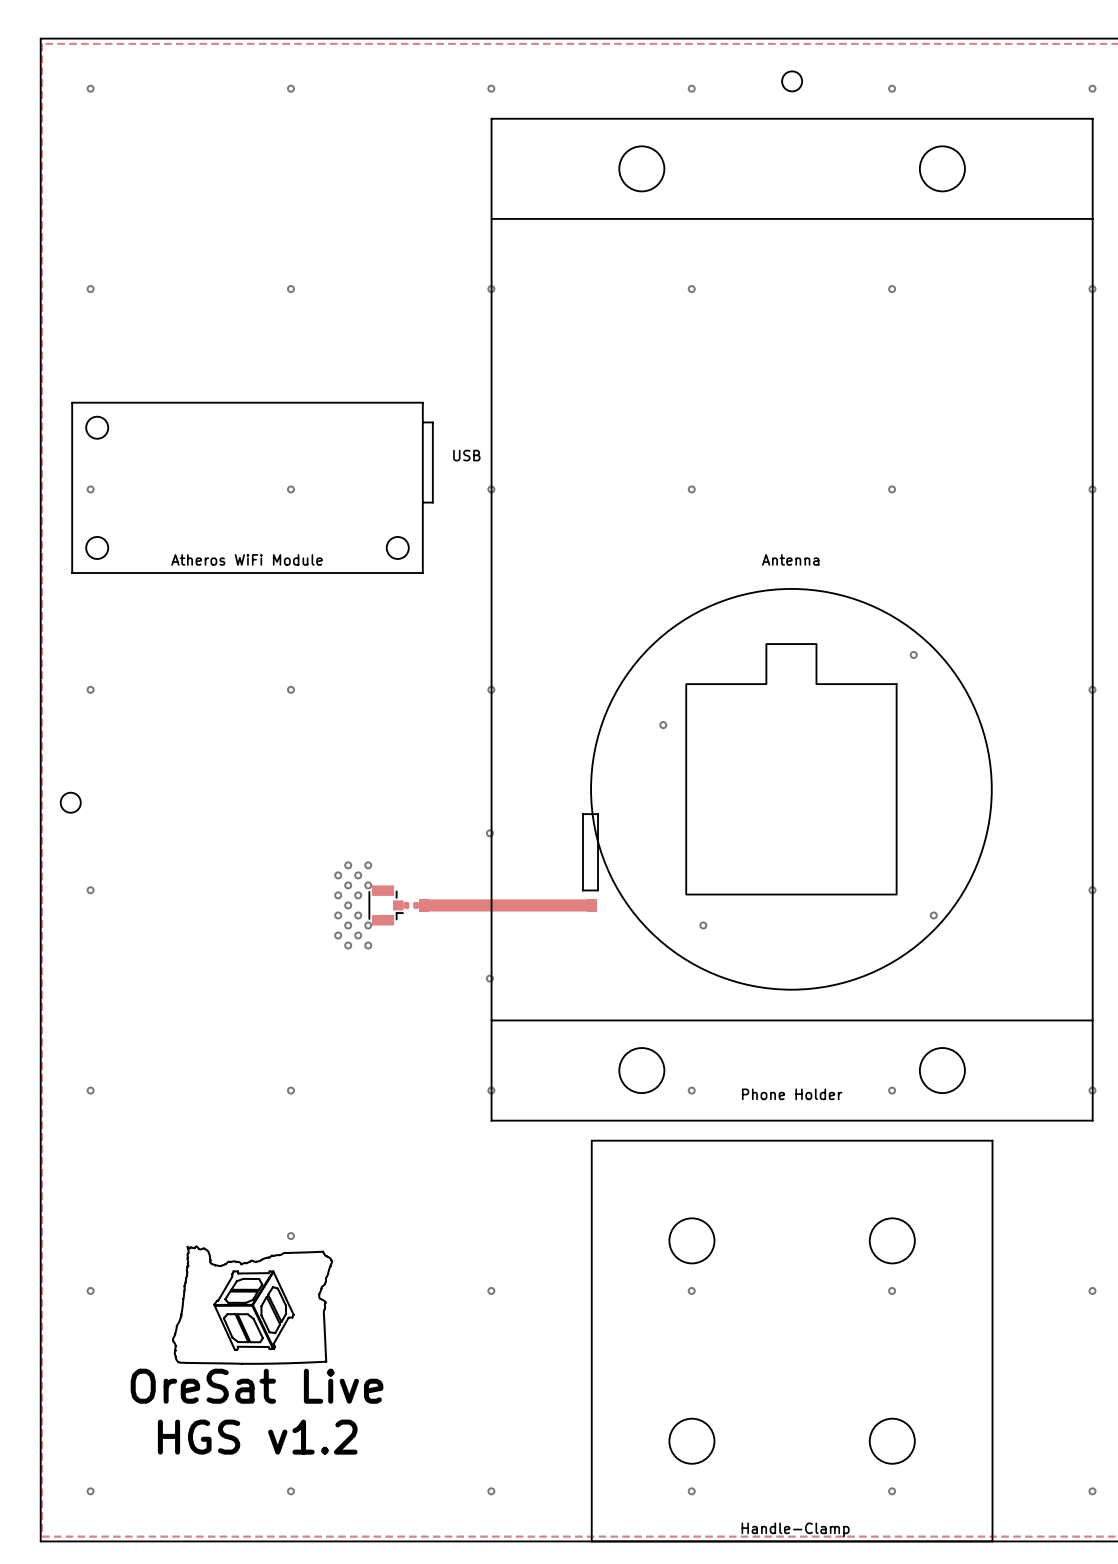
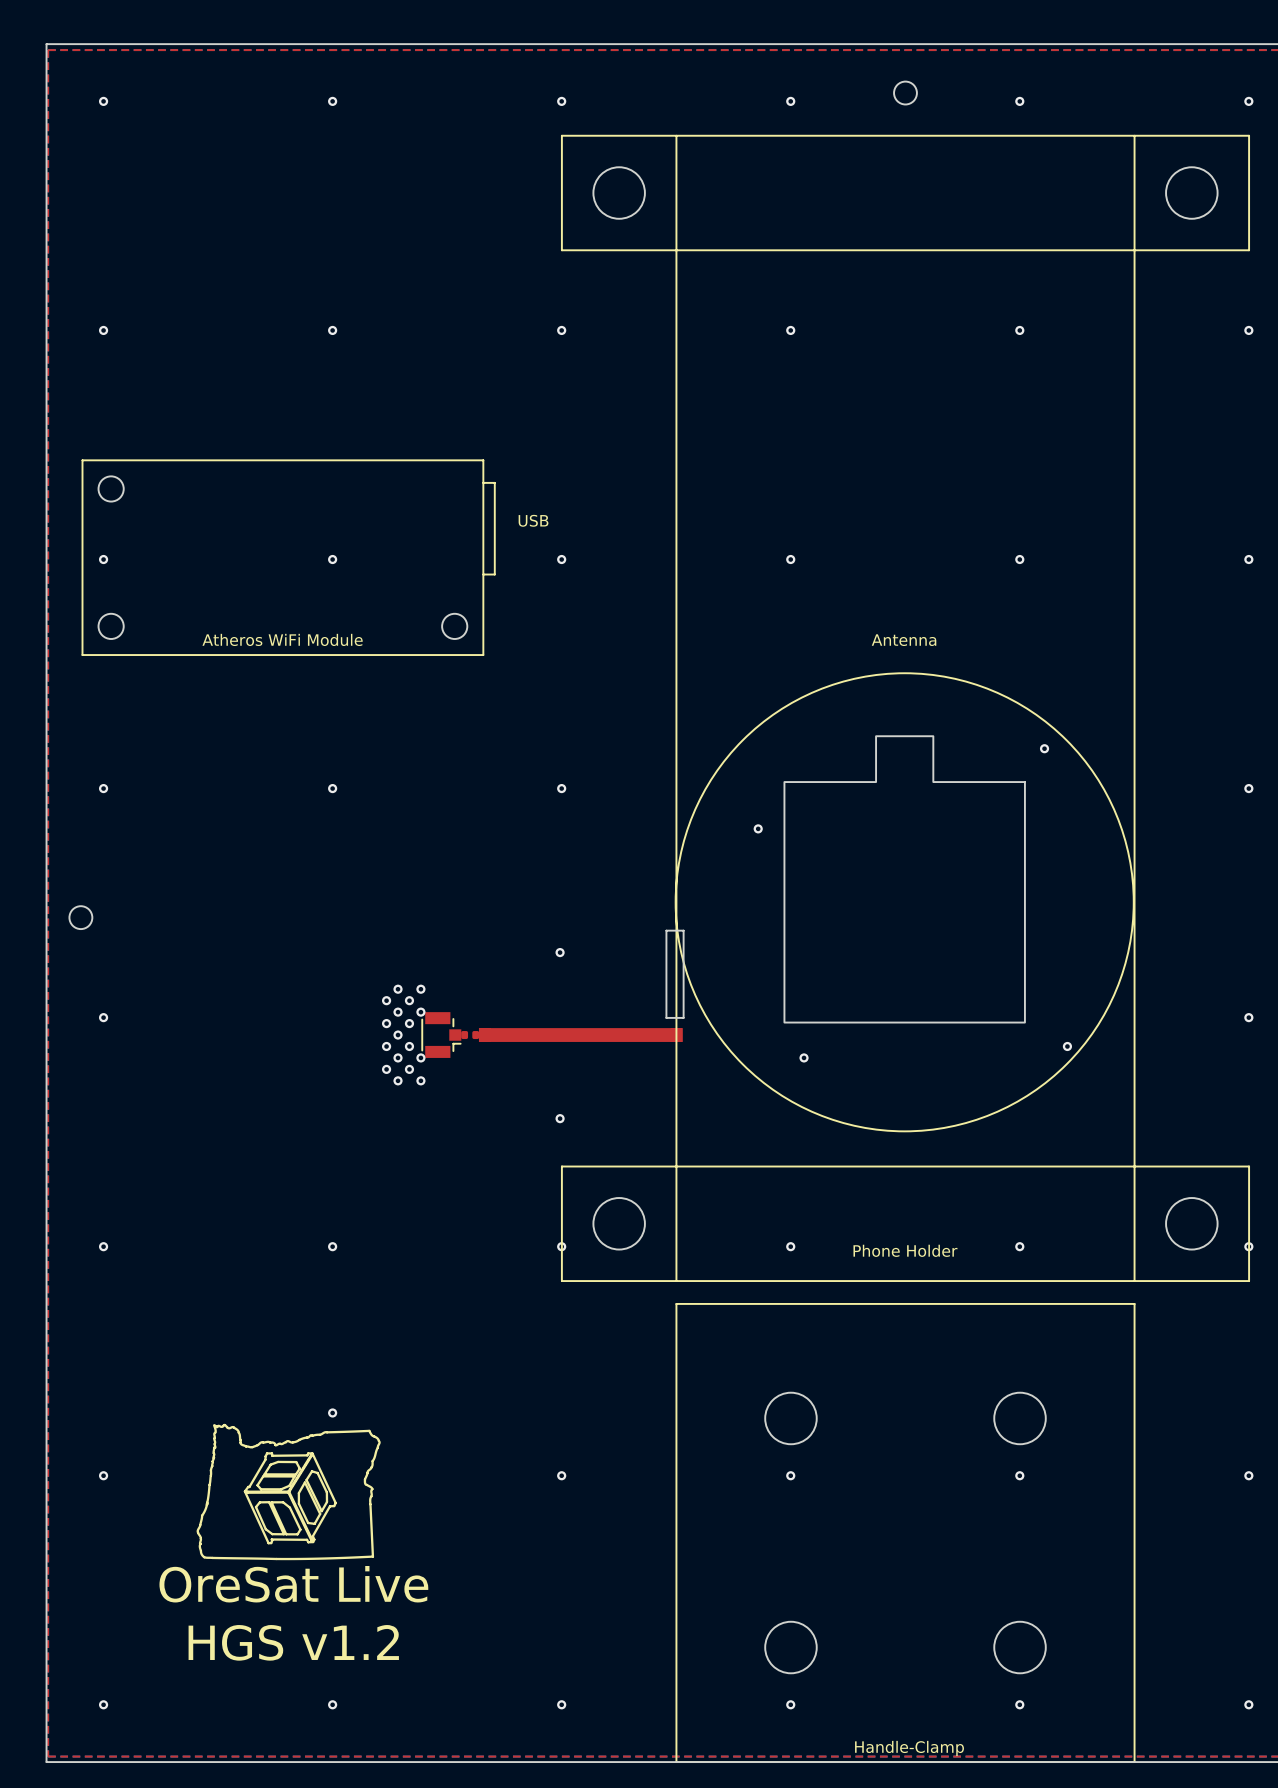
Phone Holder footprint: [490, 118, 1094, 1122] -> [561, 135, 1250, 1282]

